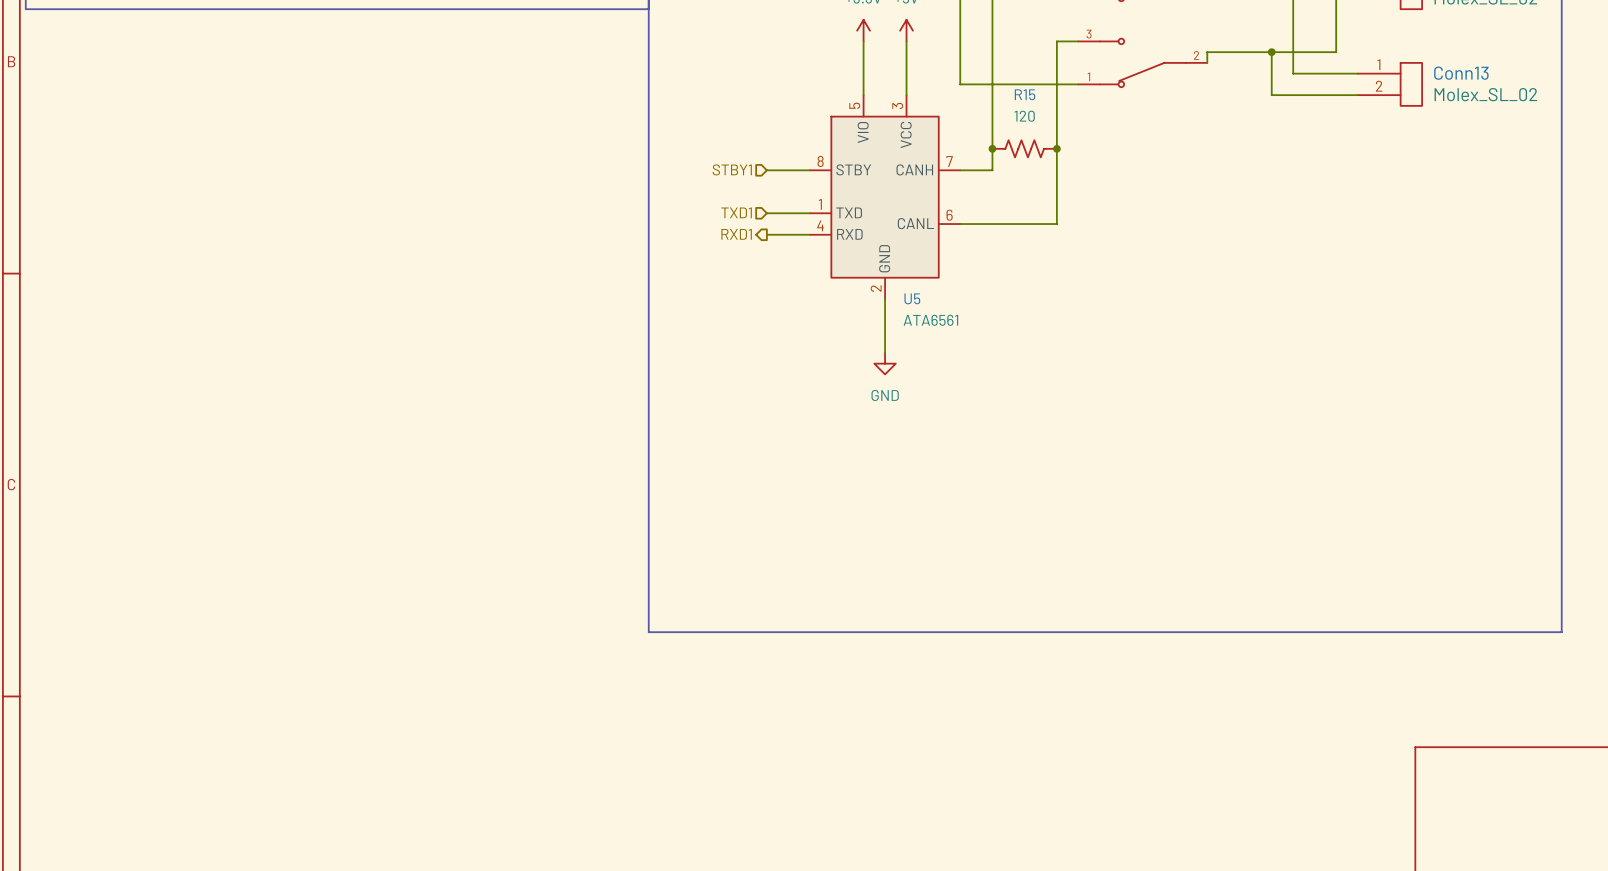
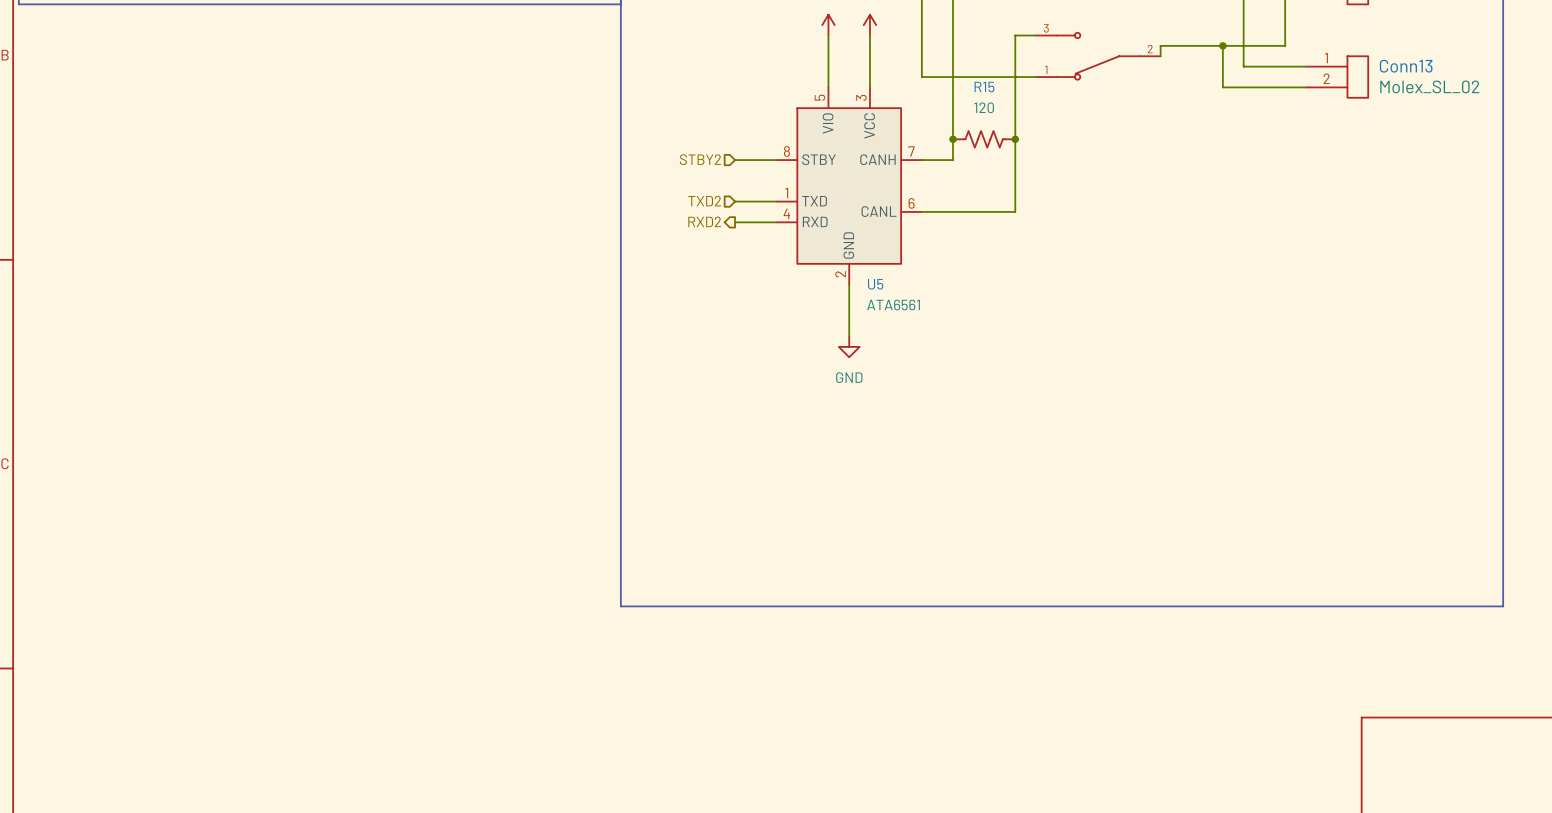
hierarchical label: STBY1 (732, 169) -> STBY2 (700, 159)
hierarchical label: TXD1 (736, 212) -> TXD2 (704, 201)
hierarchical label: RXD1 (736, 234) -> RXD2 (704, 221)

